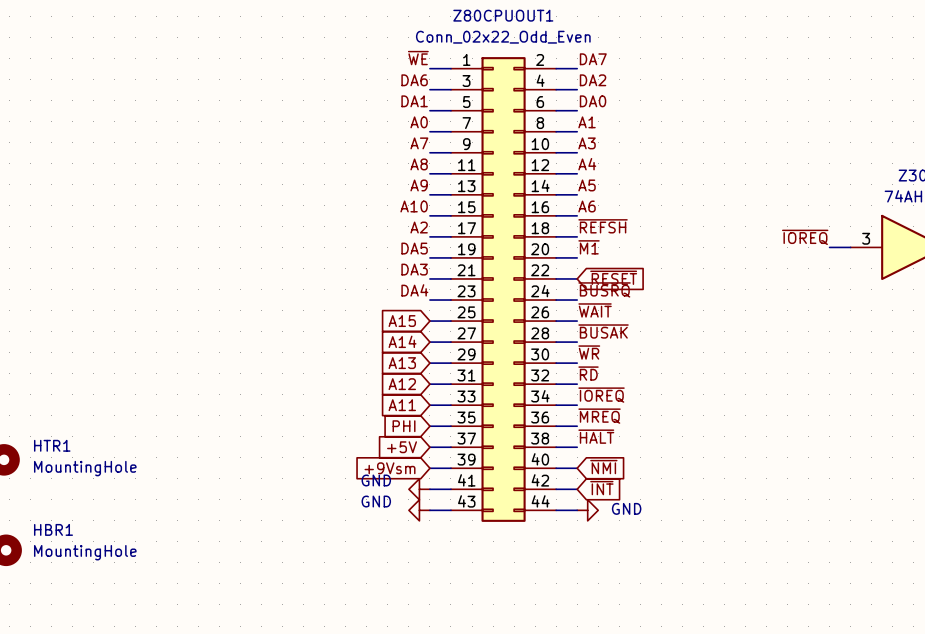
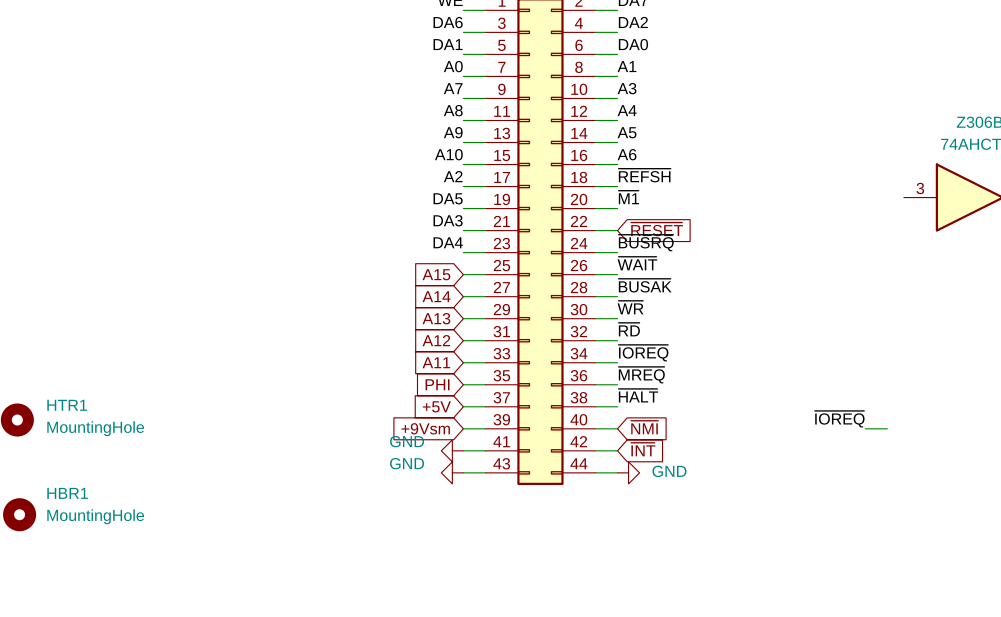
label: ~{IOREQ} (805, 237) -> none
wire: (829, 247) (850, 247) -> none
label: none -> ~{IOREQ} (839, 419)
wire: none -> (865, 428) (887, 428)

